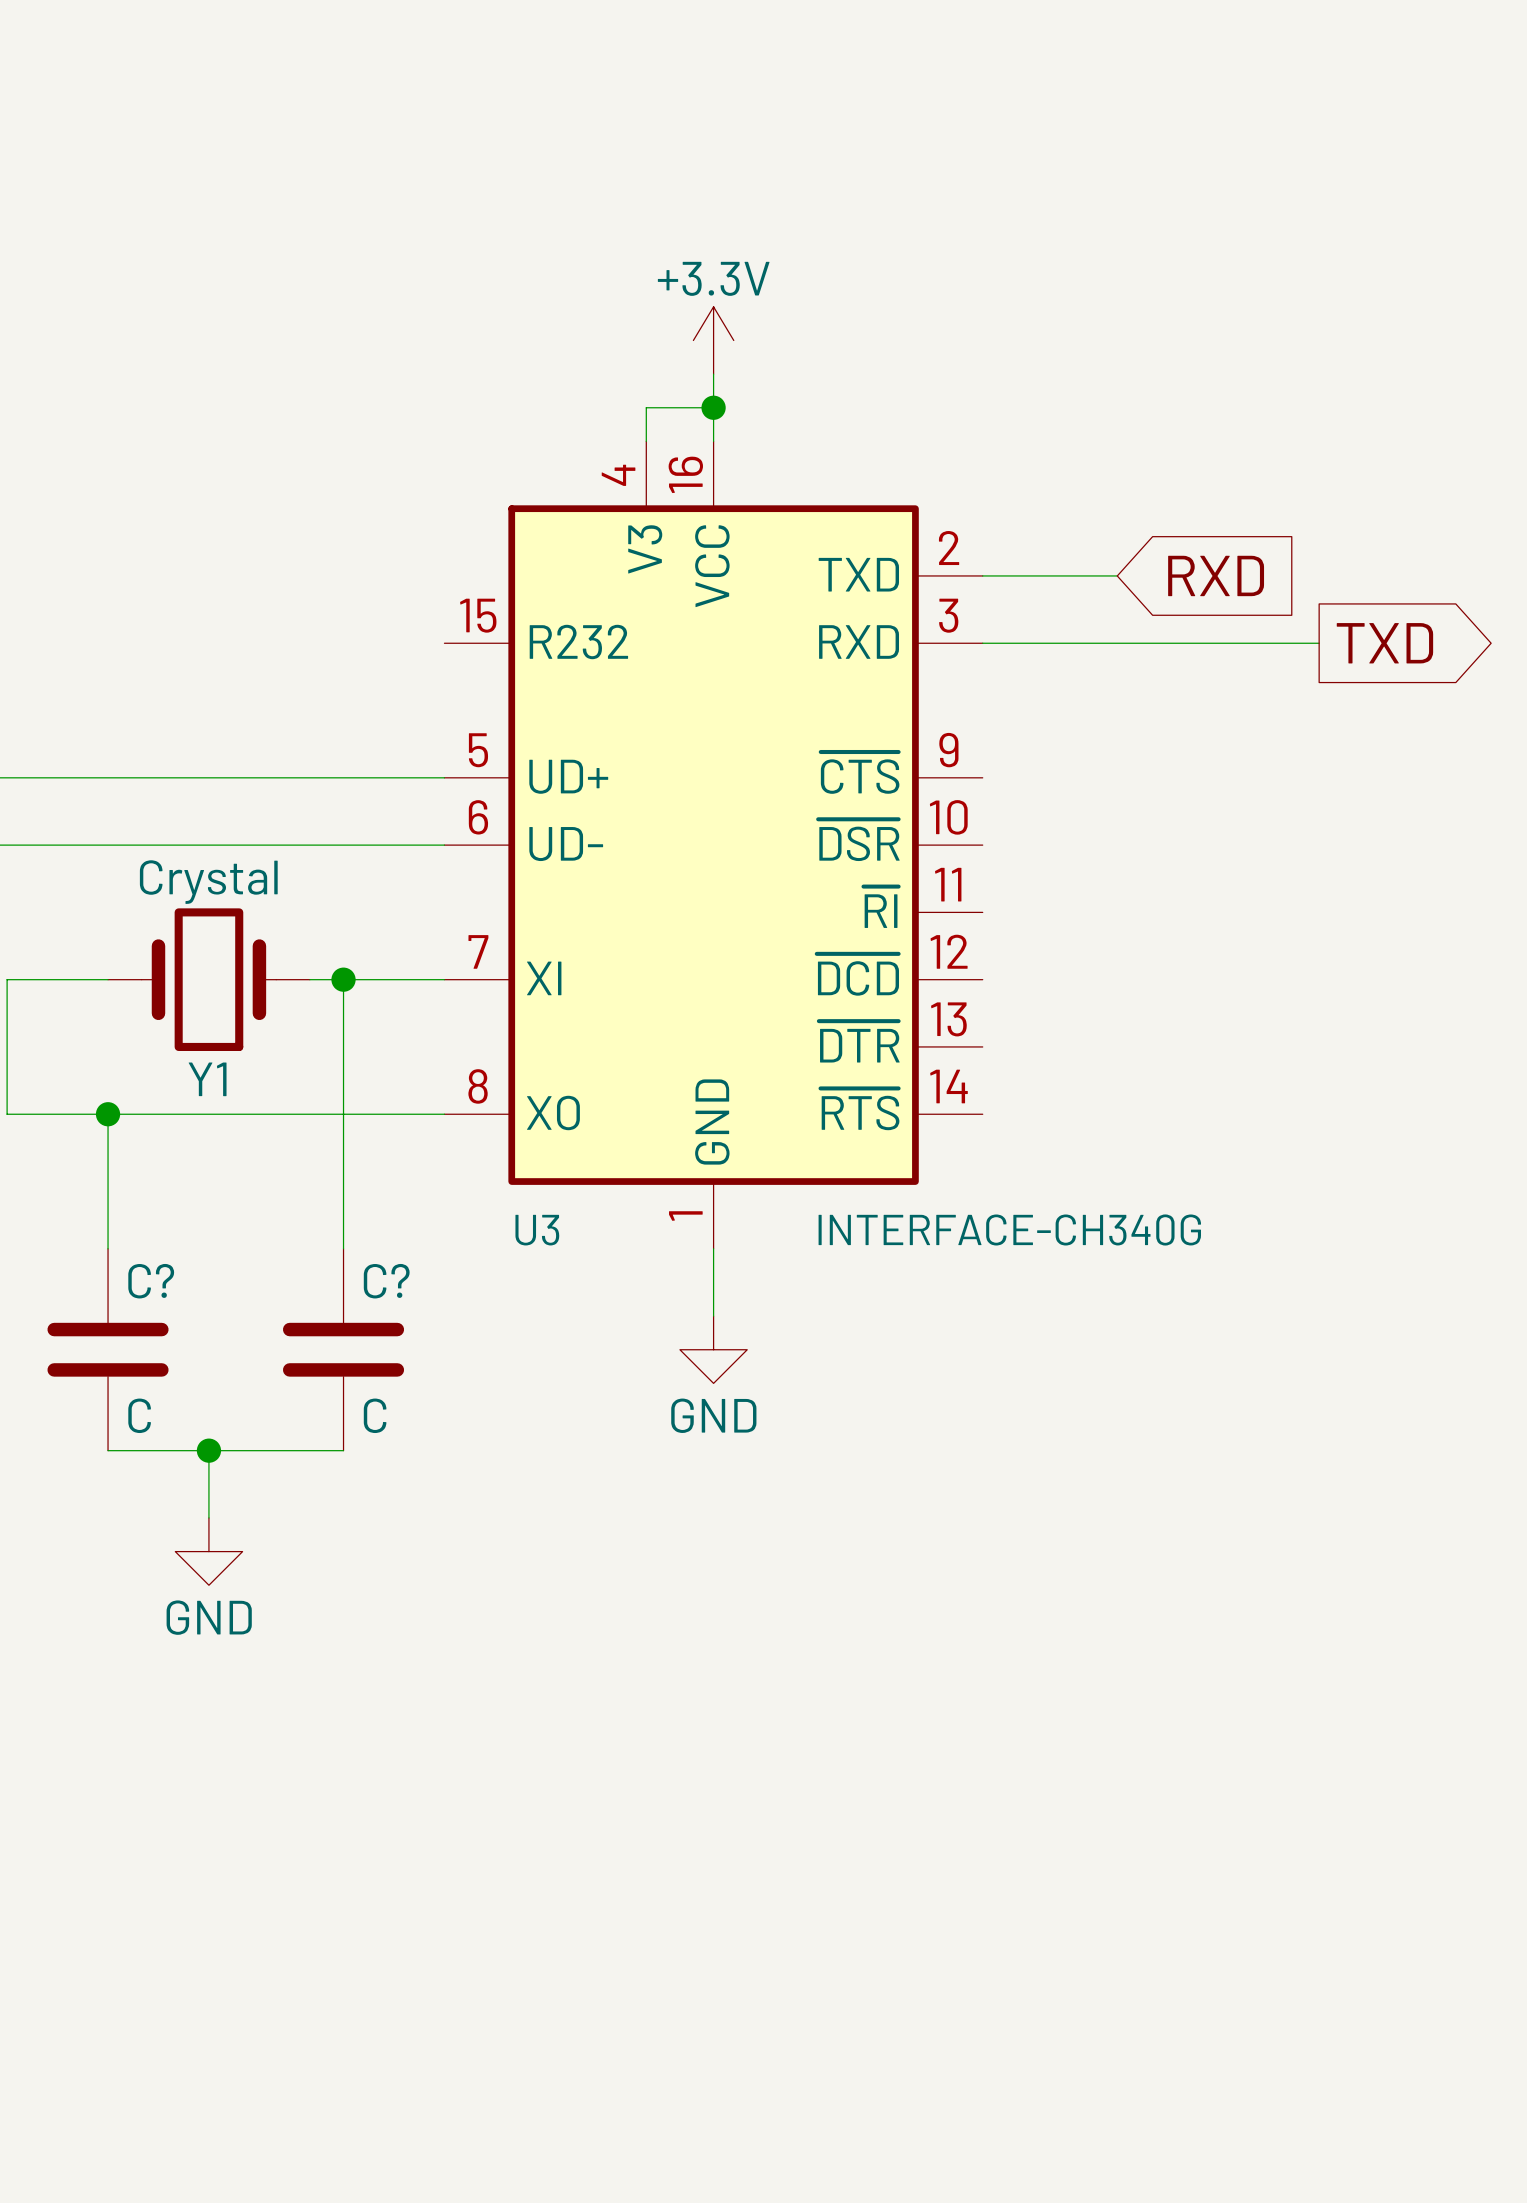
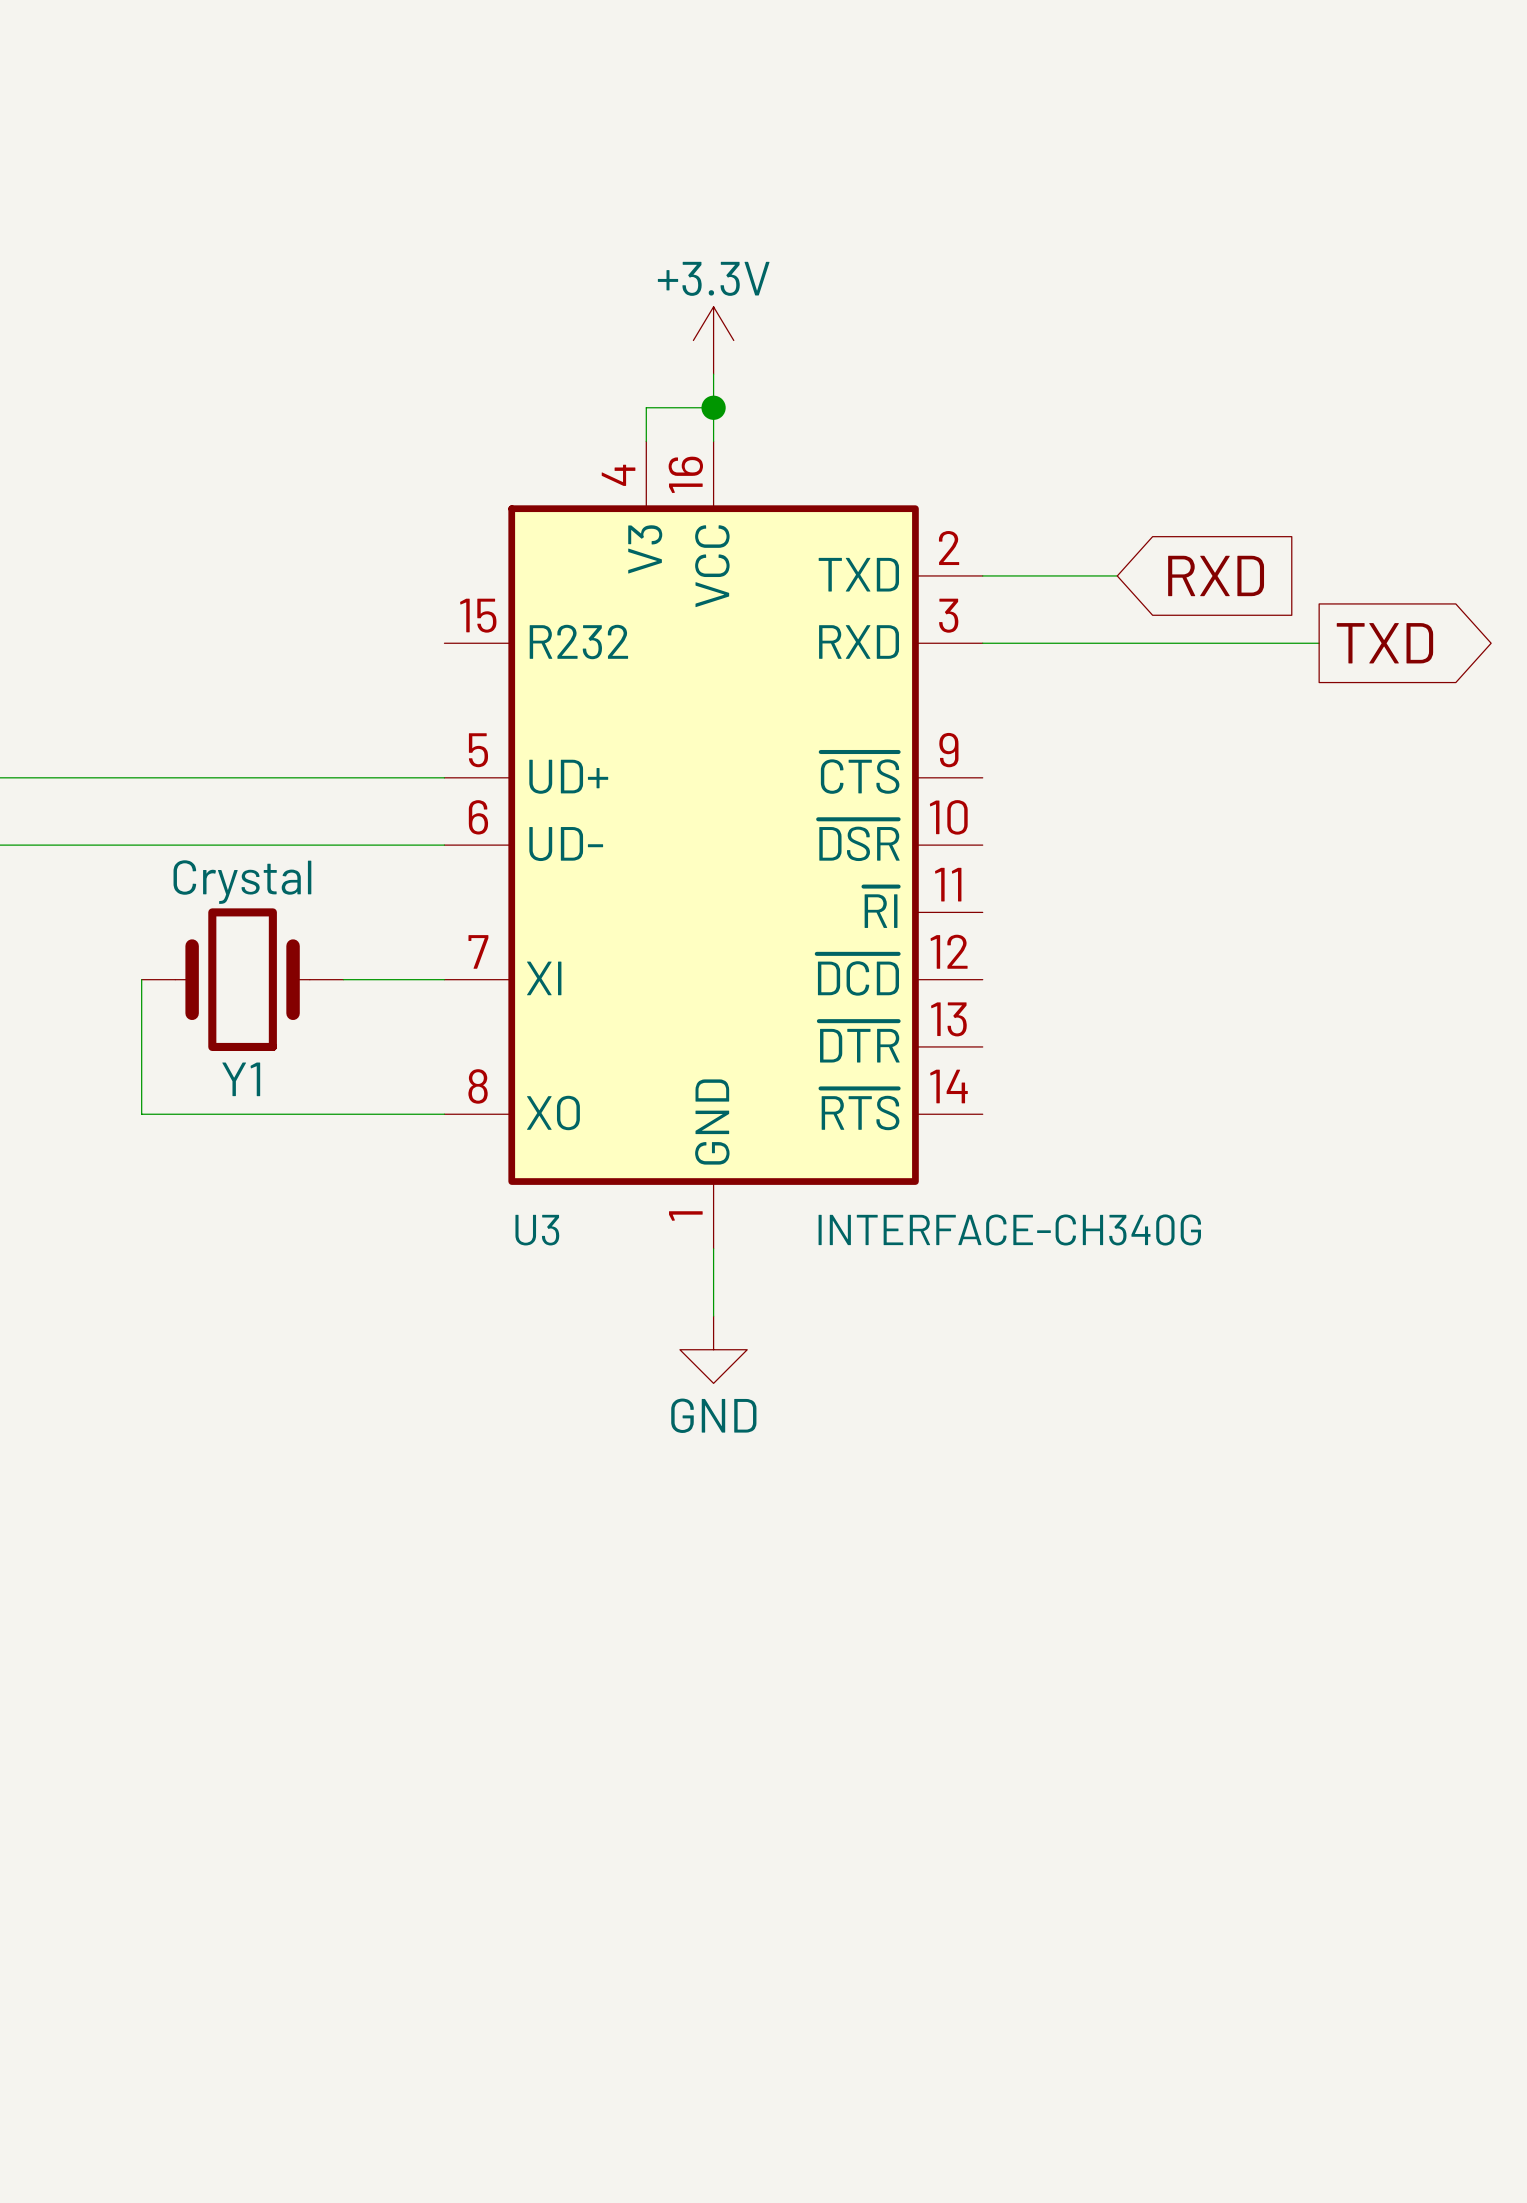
wire: (108, 979) (7, 979) (7, 1114) (141, 1114) -> (141, 979) (141, 1114)
Y1 position: (208, 979) -> (242, 979)
wire: (309, 979) (343, 979) (343, 1248) -> none
junction: (343, 979) -> none
wire: (108, 1114) (108, 1248) -> none
junction: (108, 1114) -> none
C?: C (108, 1349) -> none
C?: C (343, 1349) -> none
wire: (108, 1450) (343, 1450) -> none
wire: (208, 1450) (208, 1517) -> none
junction: (208, 1450) -> none
power symbol: GND (208, 1551) -> none

